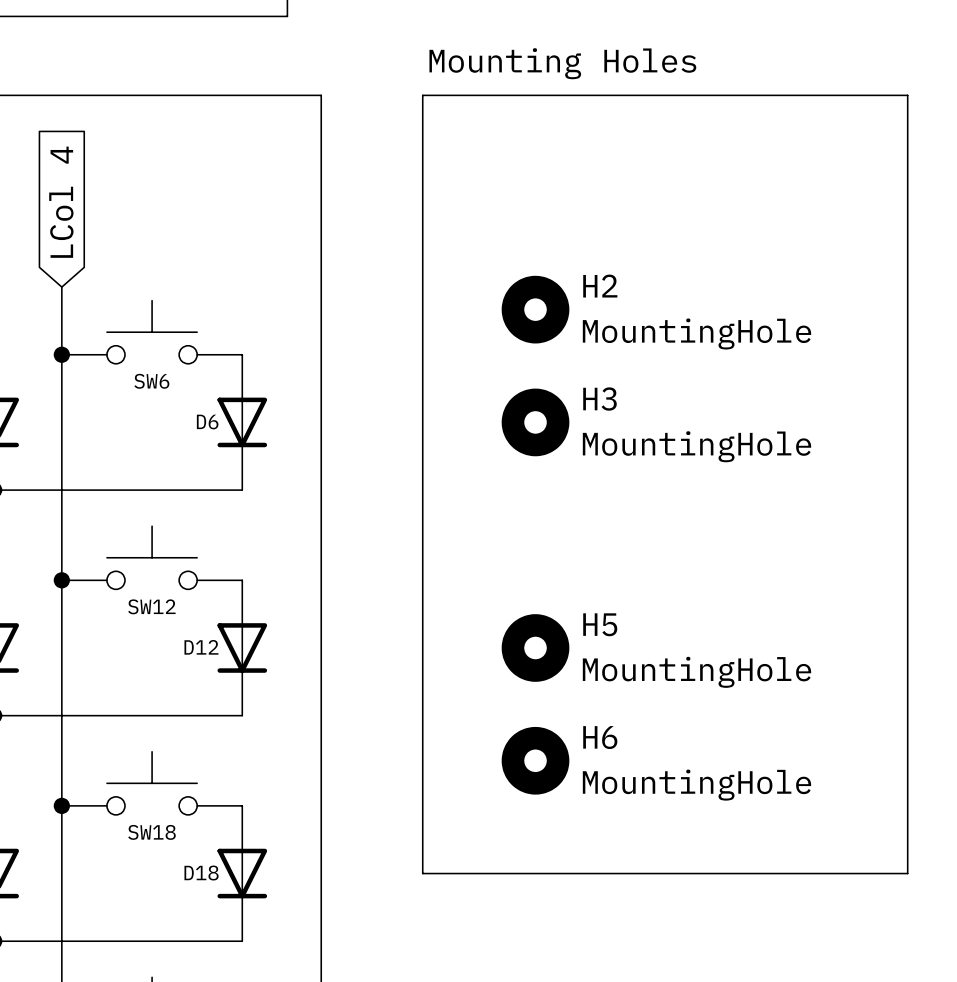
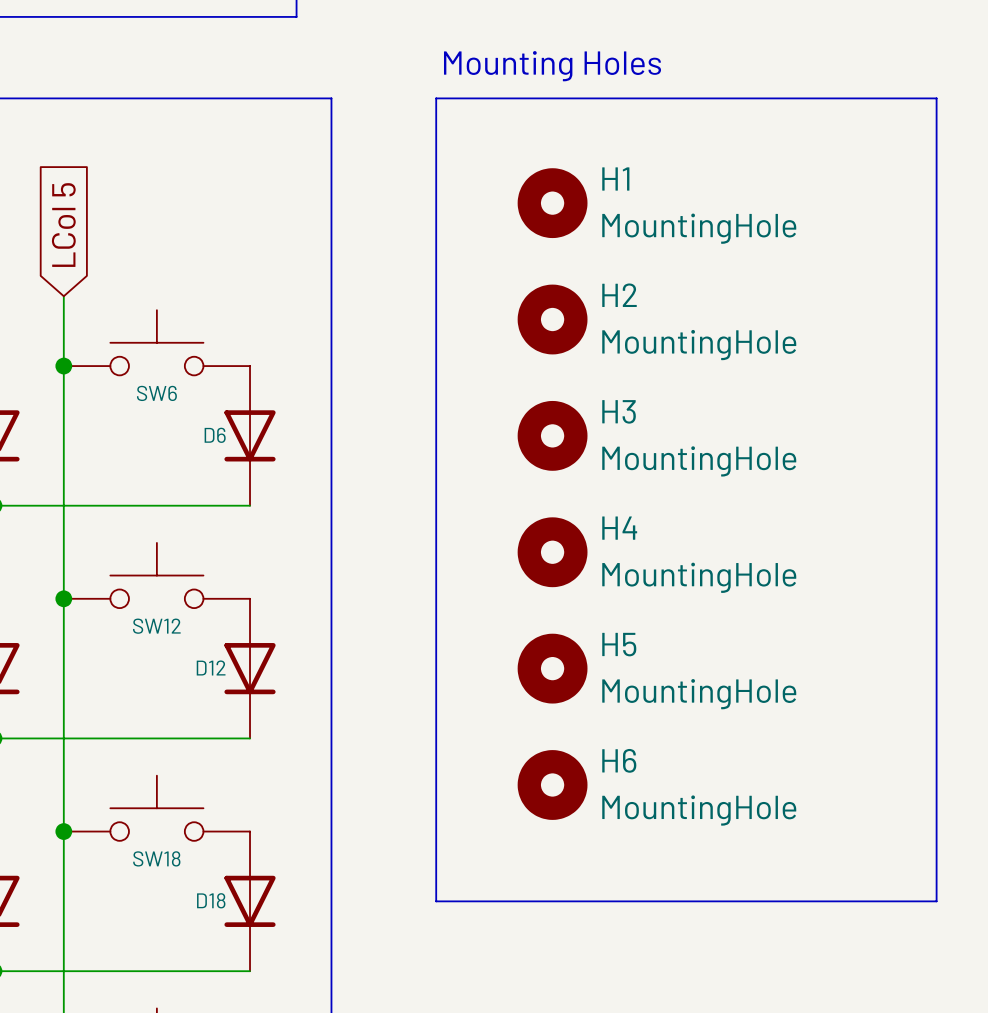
H1: none -> MountingHole (552, 203)
global label: LCol 4 (61, 202) -> LCol 5 (63, 225)
H4: none -> MountingHole (552, 552)

